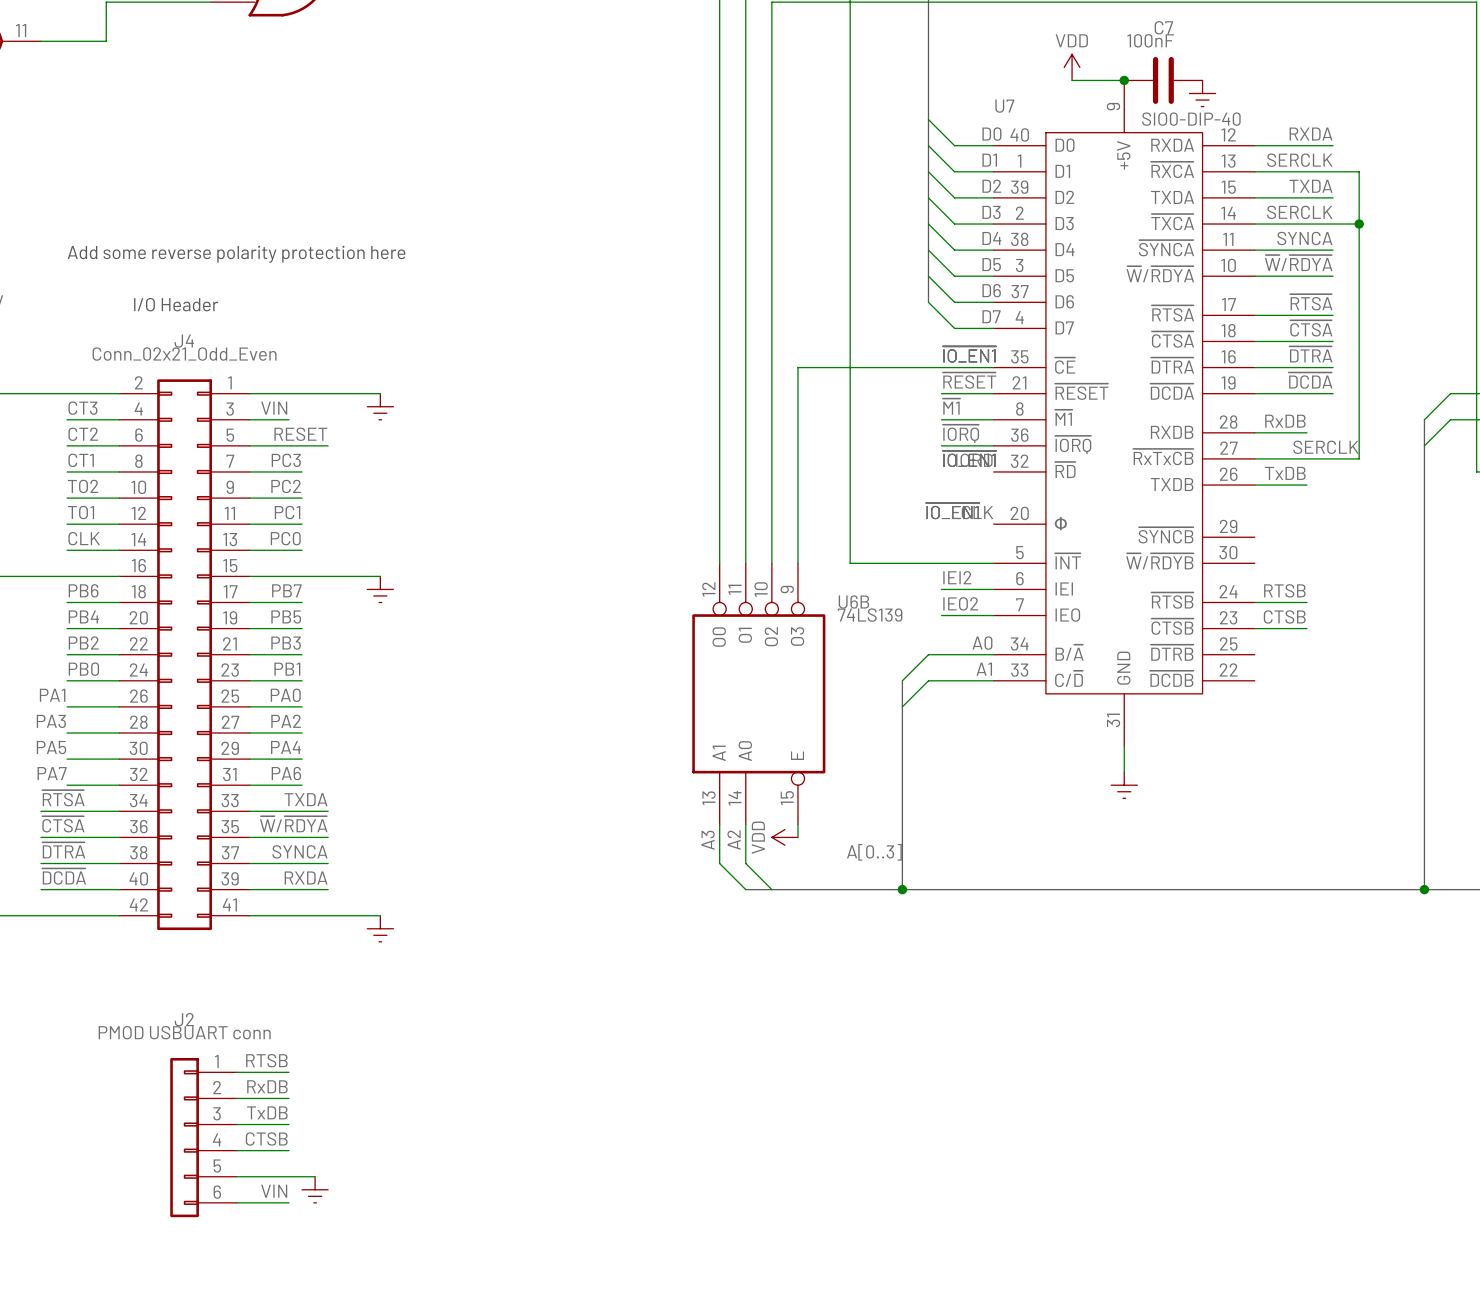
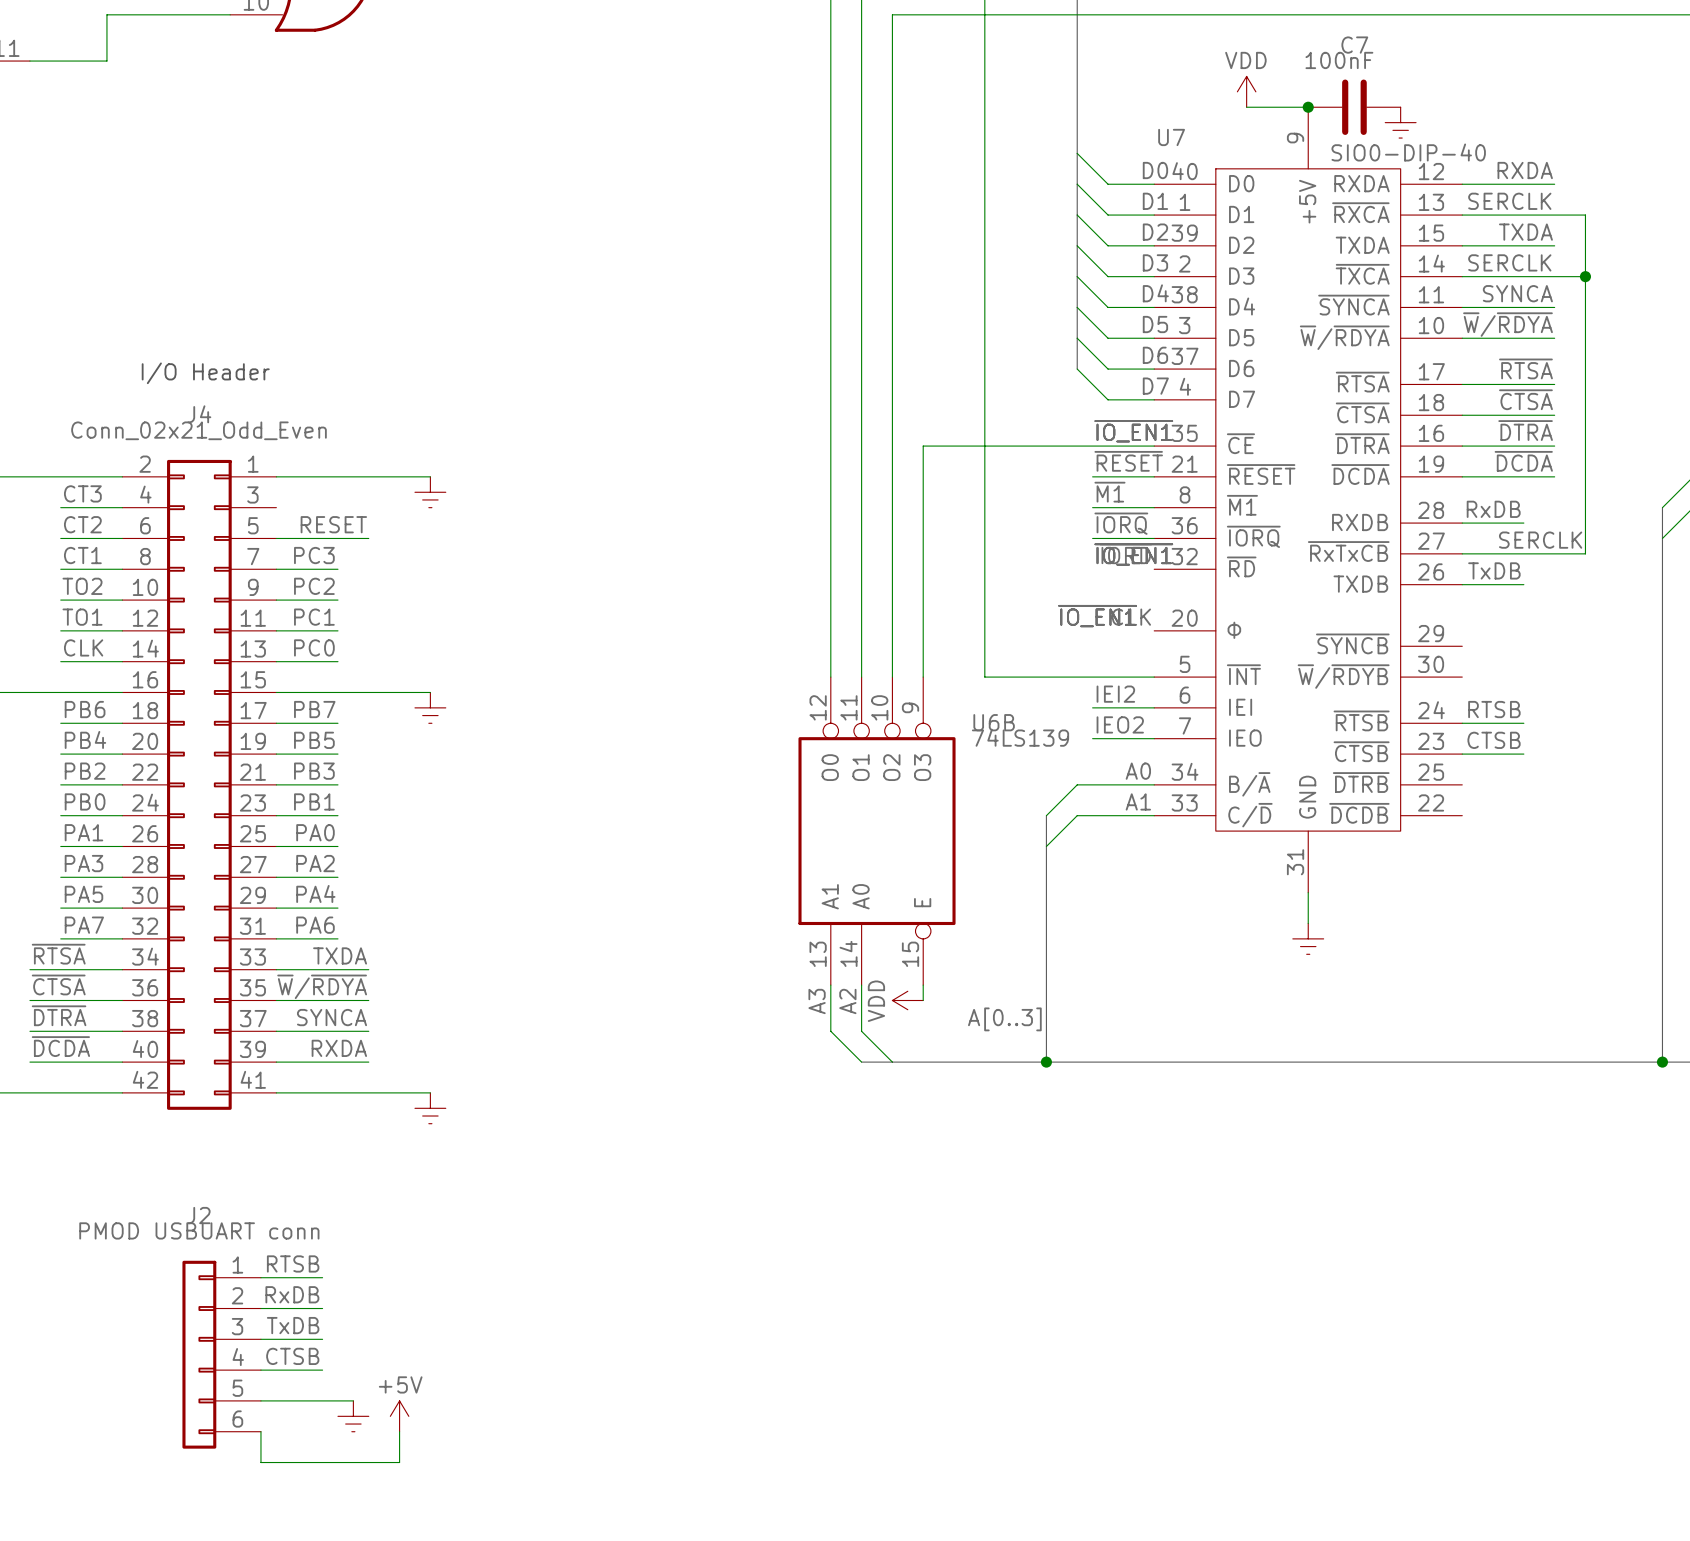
text: Add some reverse polarity protection here (236, 254) -> none
label: VIN (274, 408) -> none
wire: (249, 419) (288, 419) -> none
label position: PA1 (52, 695) -> PA1 (83, 832)
label position: PA3 (51, 721) -> PA3 (83, 863)
label position: PA5 (51, 747) -> PA5 (83, 894)
label position: PA7 (52, 773) -> PA7 (84, 925)
power symbol: none -> +5V (399, 1416)
label: VIN (274, 1191) -> none
wire: (236, 1202) (288, 1202) -> (260, 1431) (260, 1462) (399, 1462) (399, 1431)

